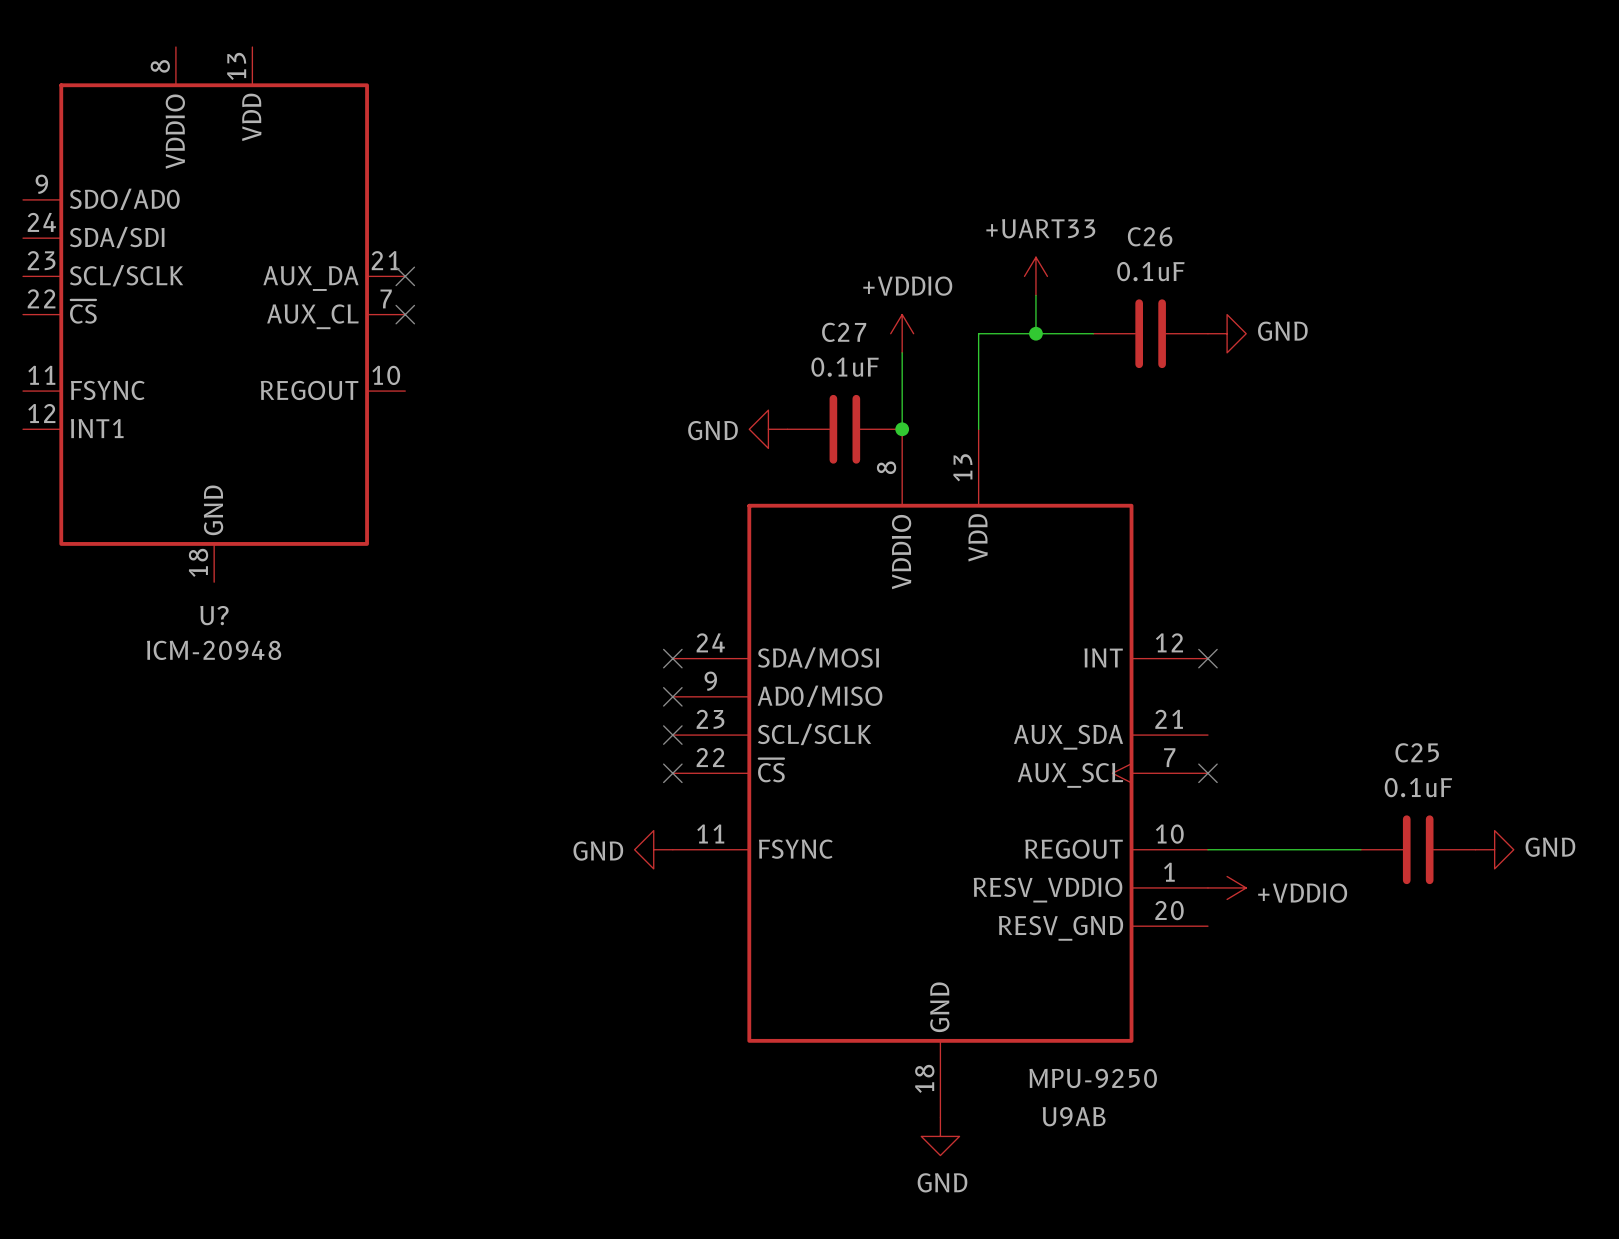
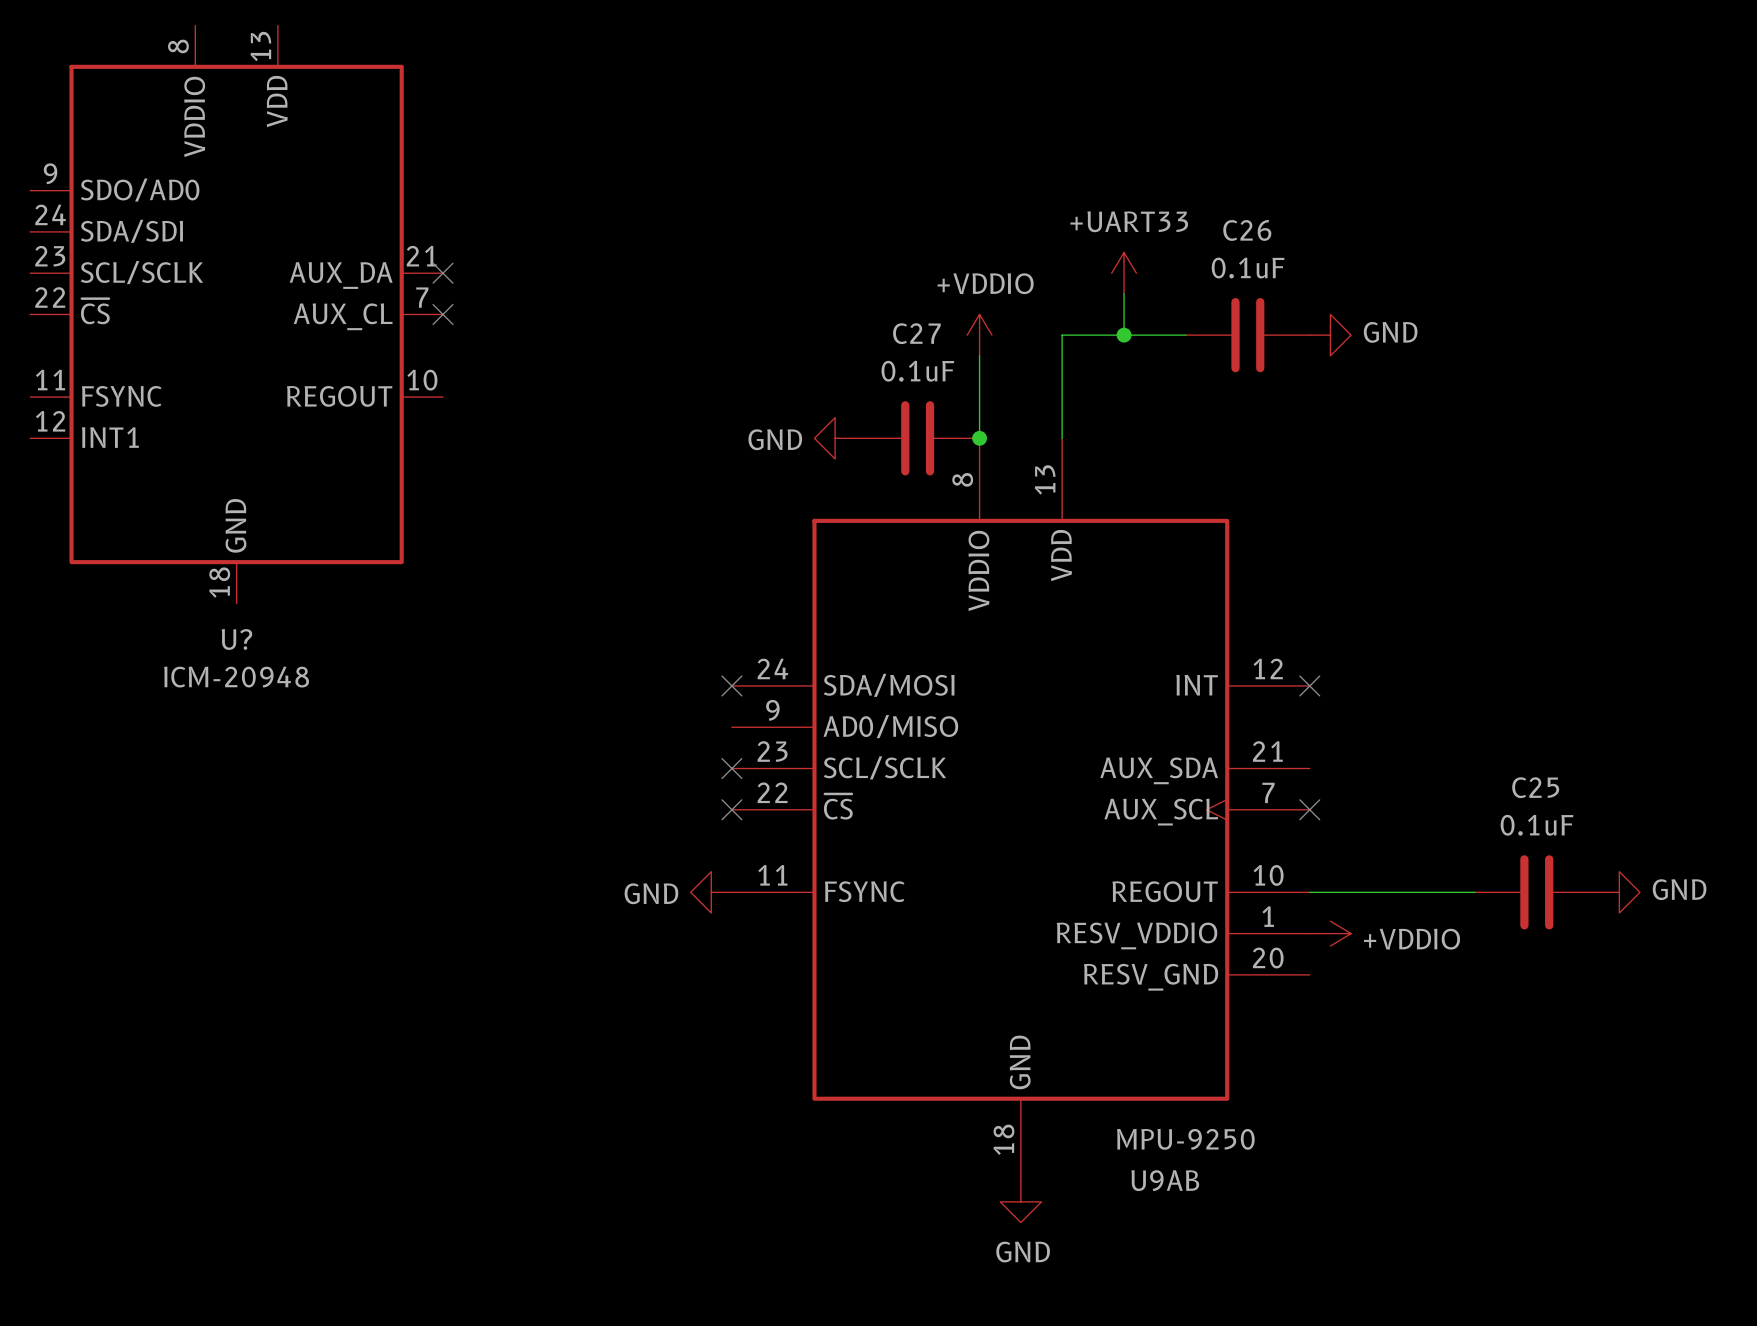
no-connect mark: (672, 696) -> none

